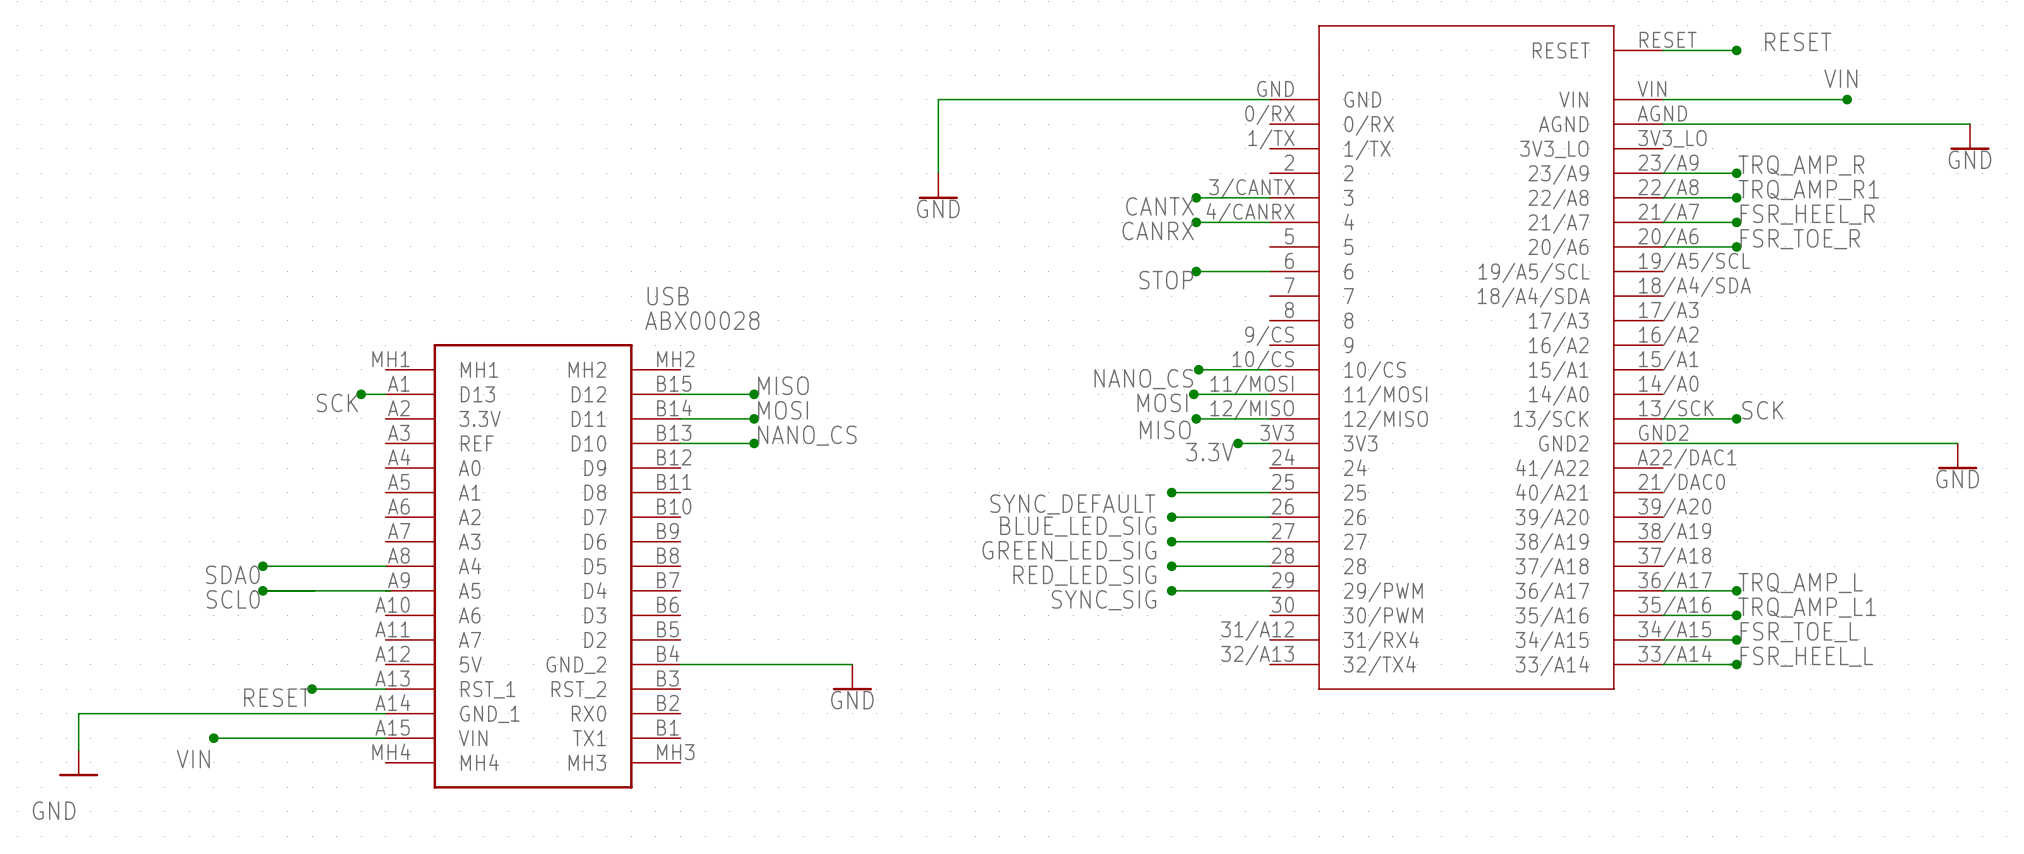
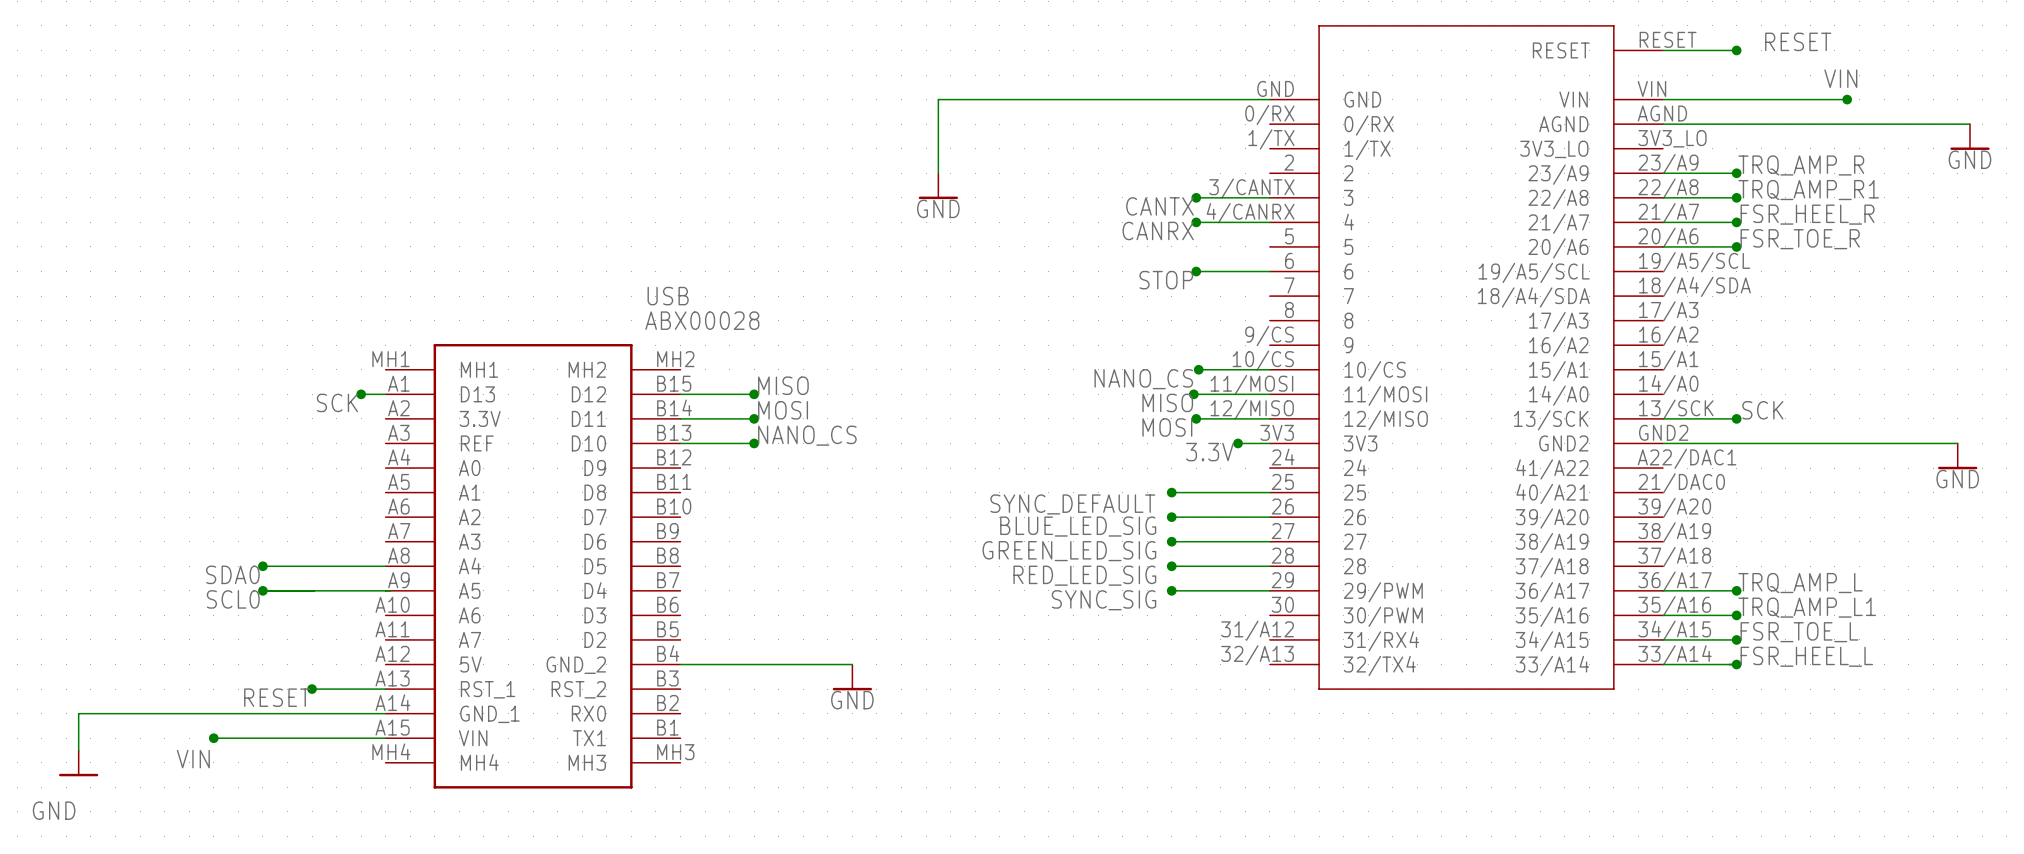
label: MOSI (1162, 402) -> MISO (1167, 402)
label: MISO (1165, 429) -> MOSI (1167, 427)

